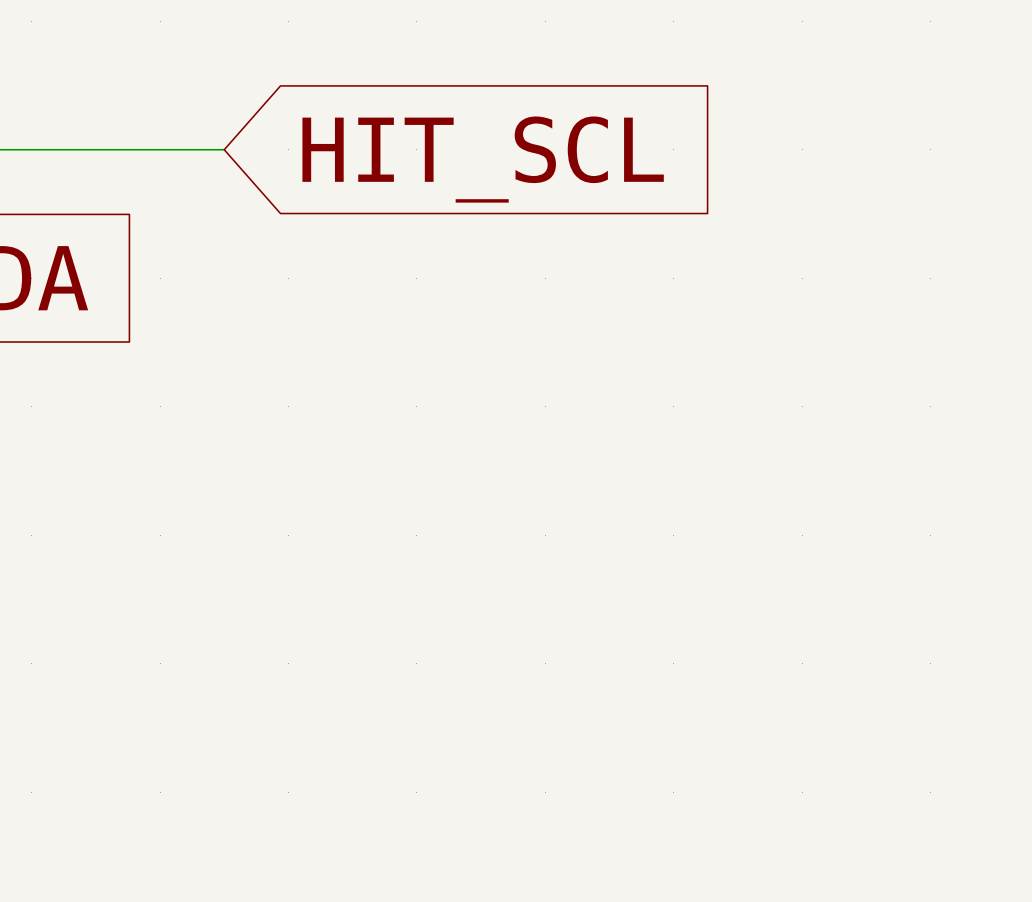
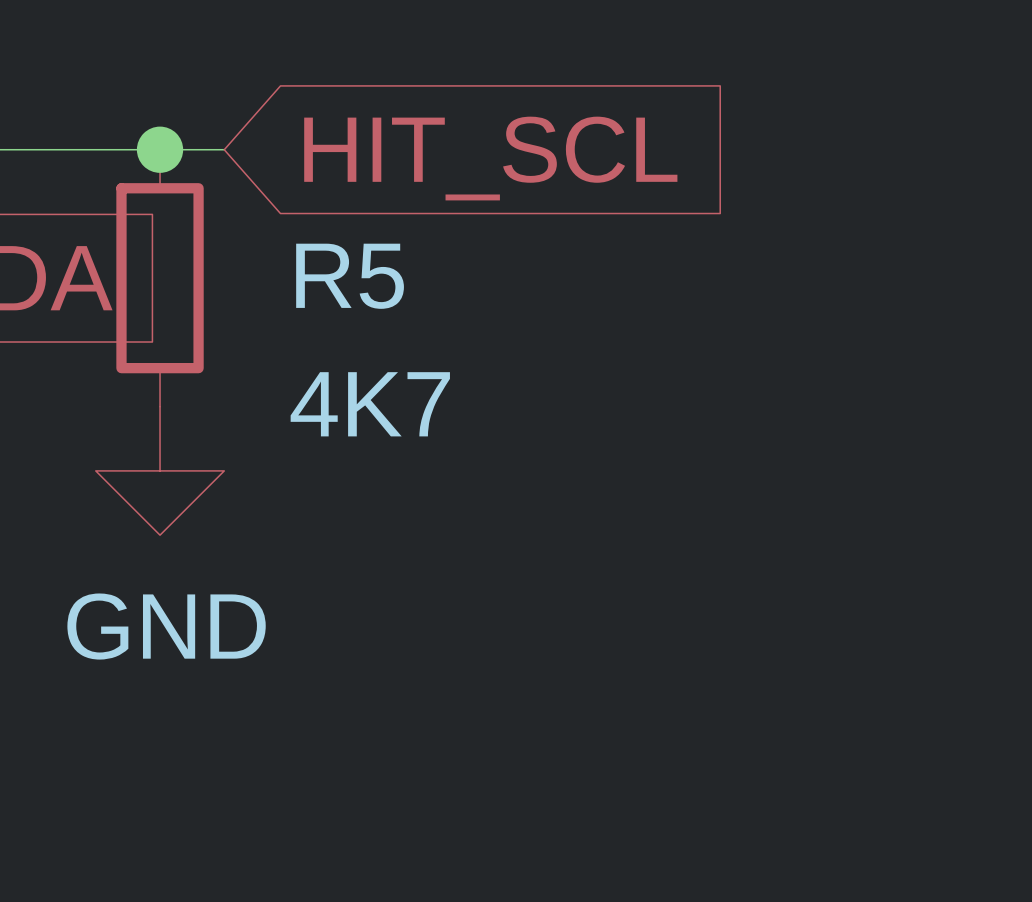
junction: none -> (160, 149)
R5: none -> 4K7 (160, 278)
power symbol: none -> GND (160, 470)

